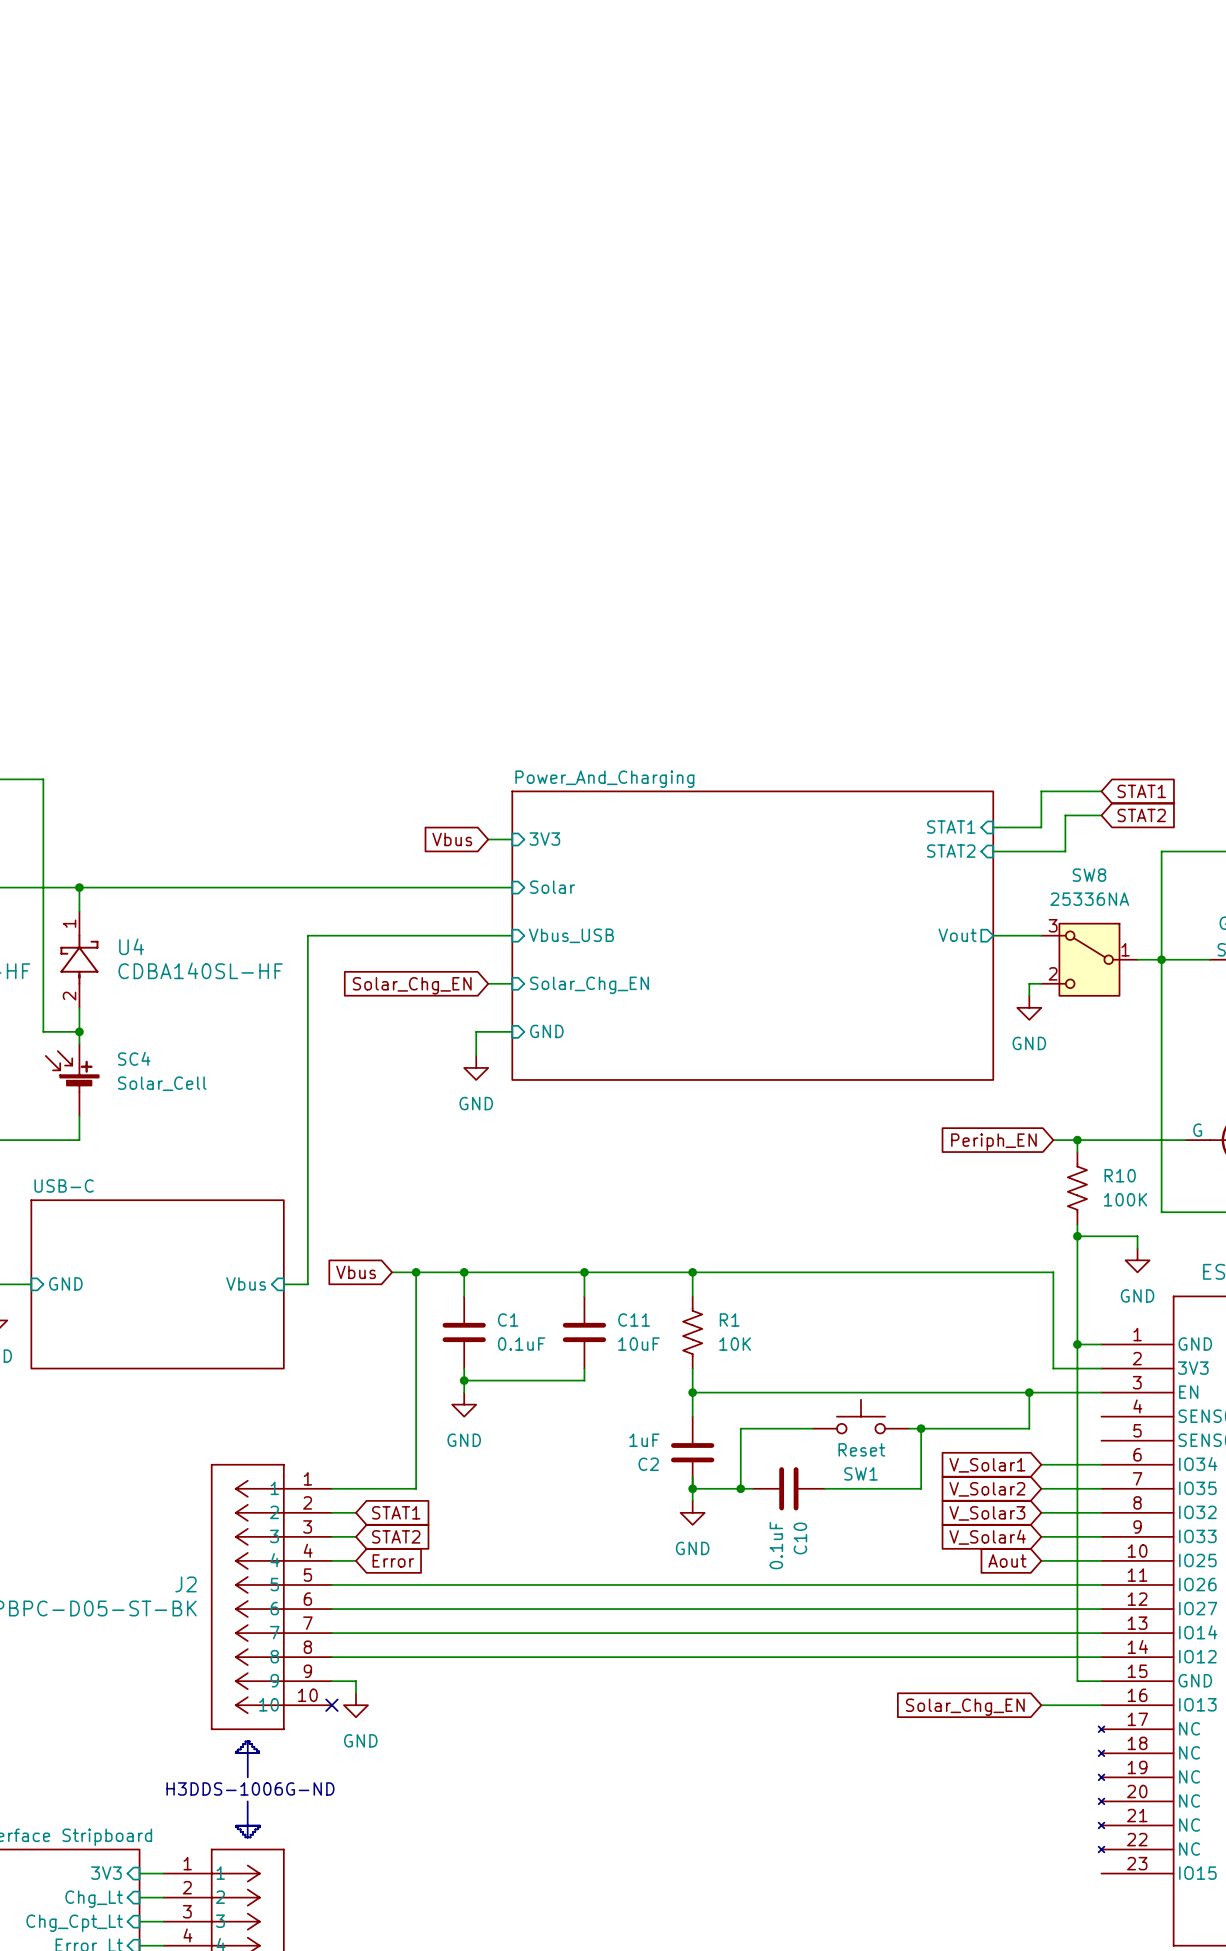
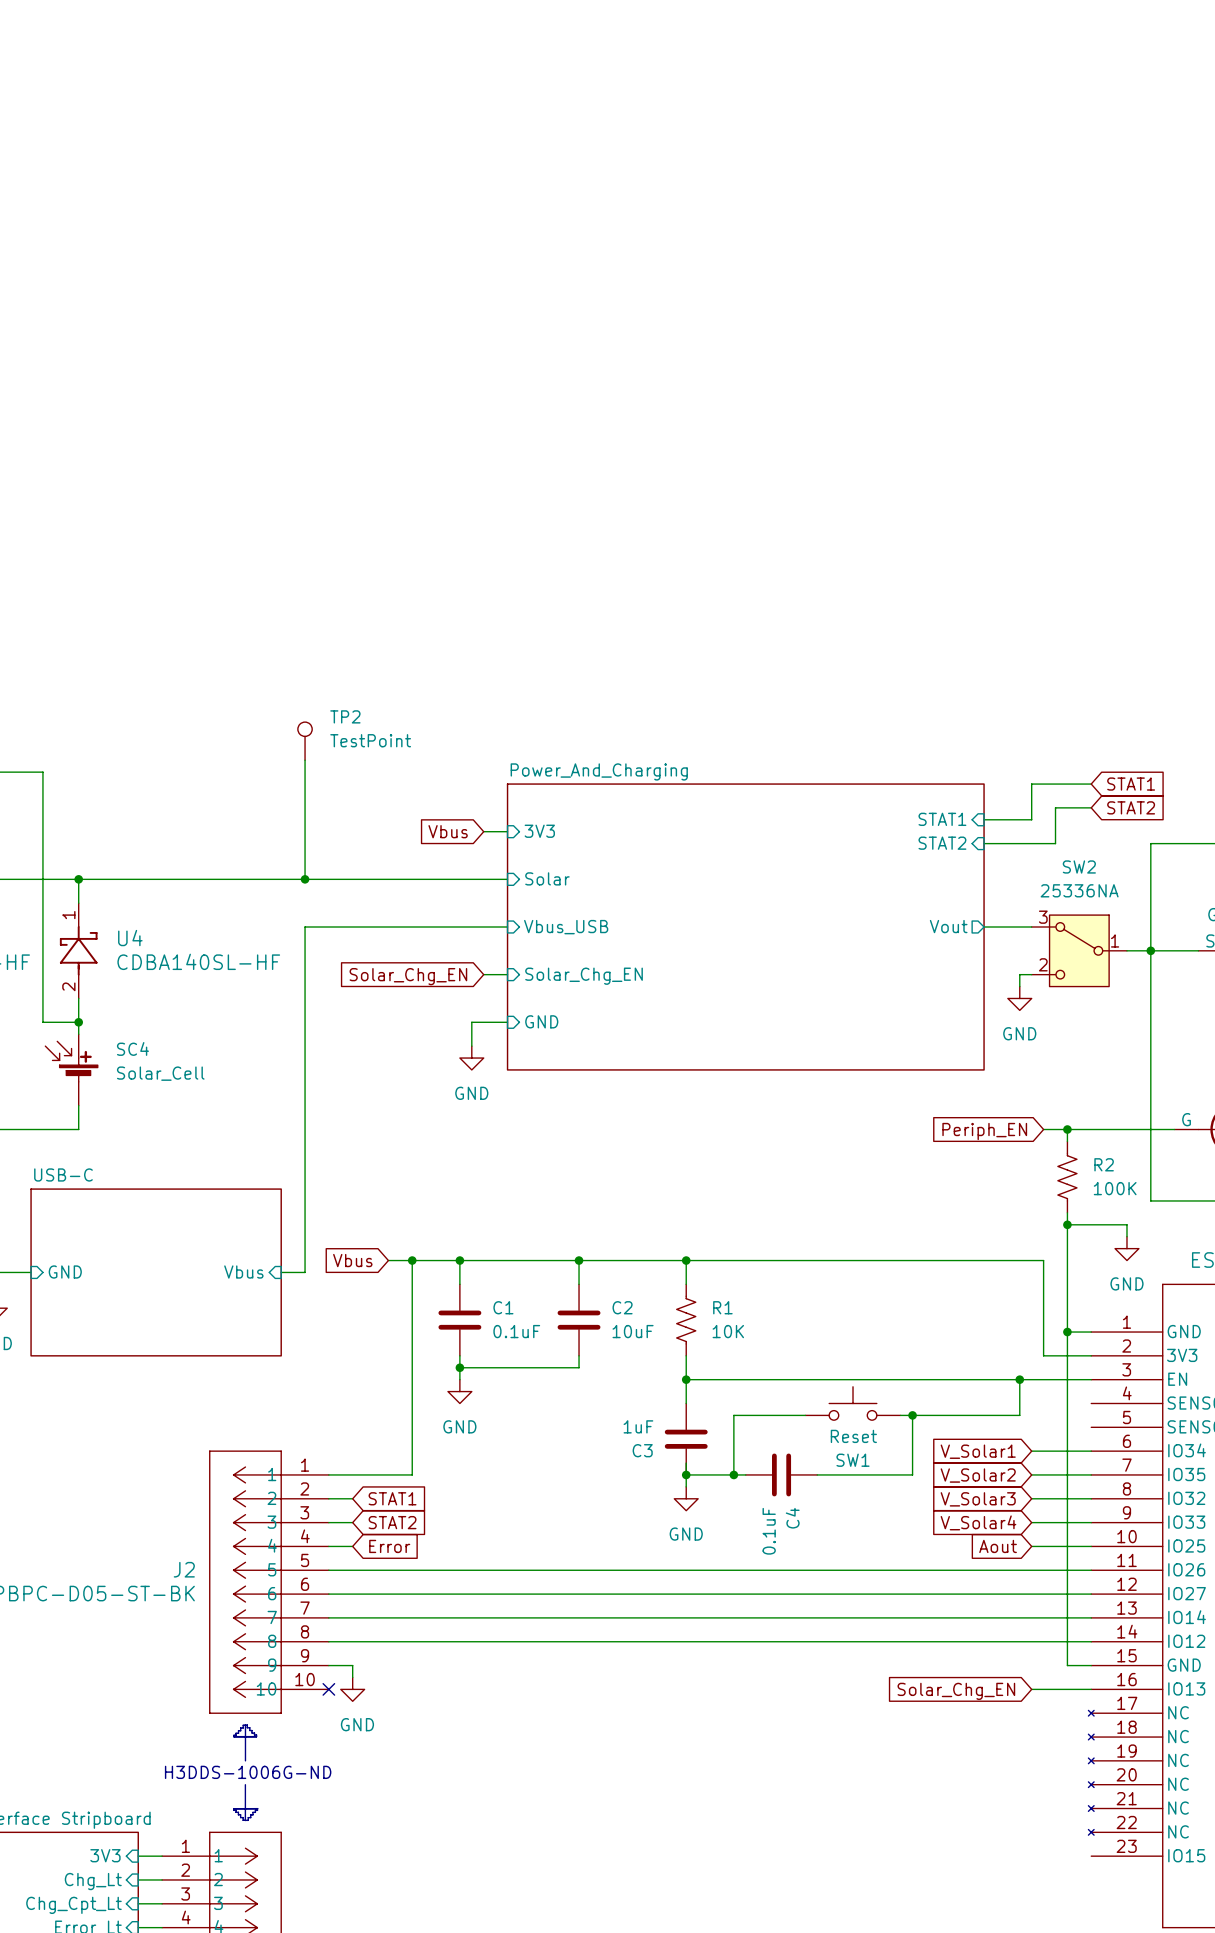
TP2: none -> TestPoint (305, 741)
wire: none -> (305, 760) (305, 879)
SW8 name: SW8 (1089, 875) -> SW2 (1079, 866)
junction: none -> (305, 879)
R10 name: R10 (1120, 1175) -> R2 (1104, 1164)
C11 name: C11 (634, 1320) -> C2 (622, 1307)
C2 name: C2 (648, 1464) -> C3 (642, 1450)
C10 name: C10 (800, 1538) -> C4 (792, 1518)

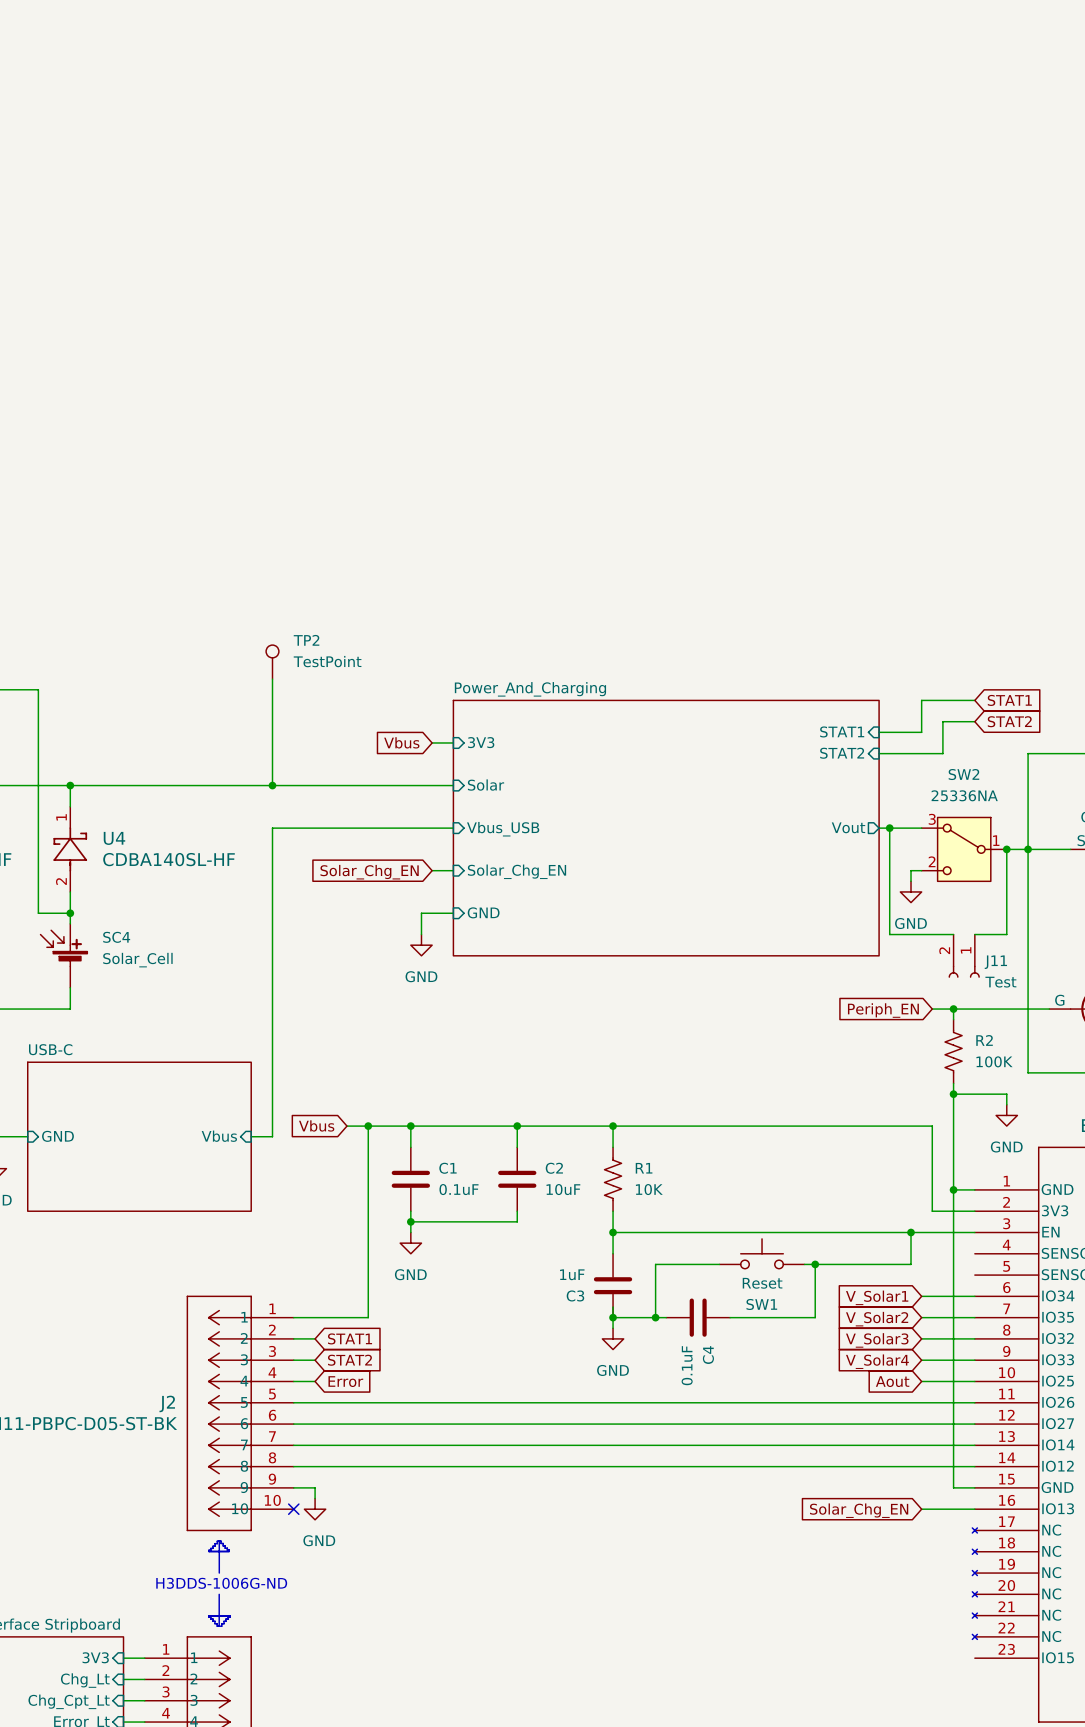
wire: none -> (889, 828) (889, 934) (953, 934)
junction: none -> (889, 828)
wire: none -> (1006, 849) (1006, 934) (974, 934)
junction: none -> (1006, 849)
J11: none -> Test (964, 956)

